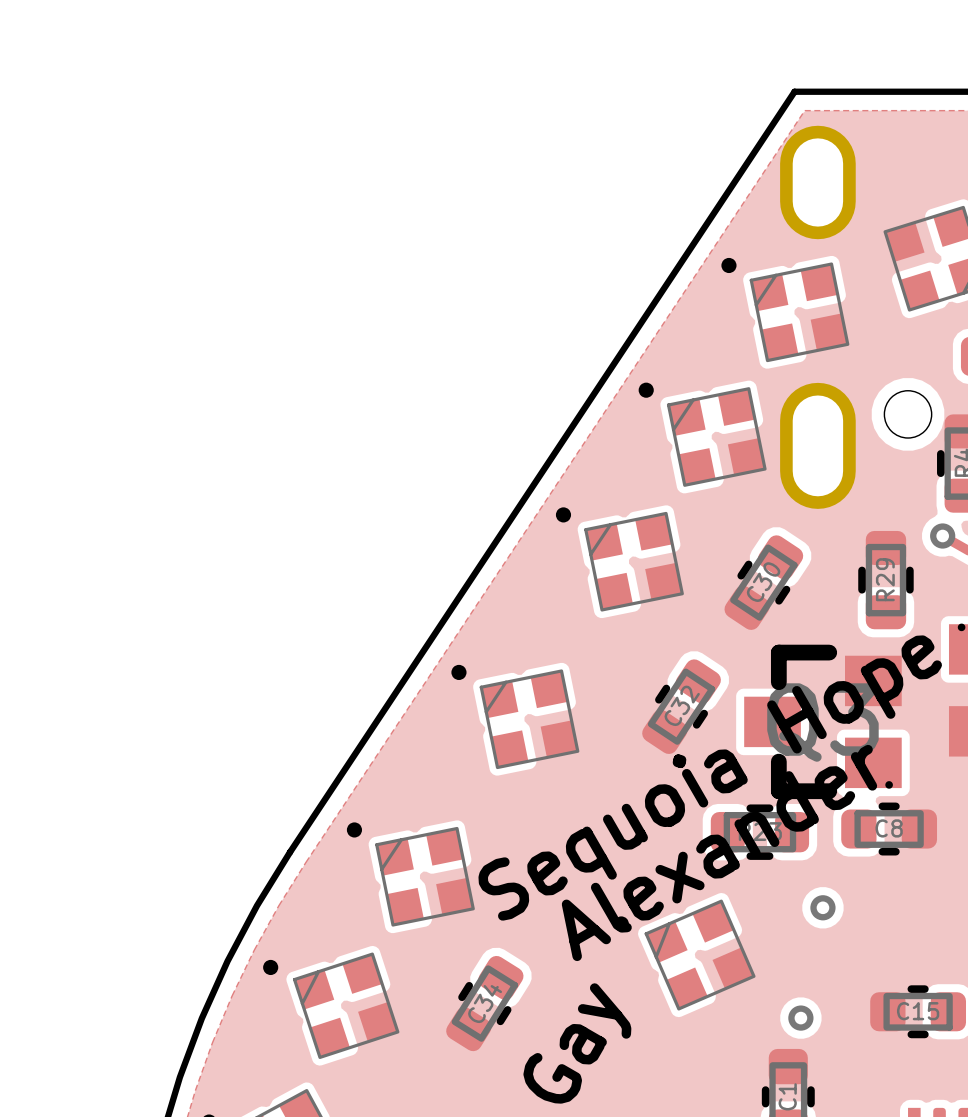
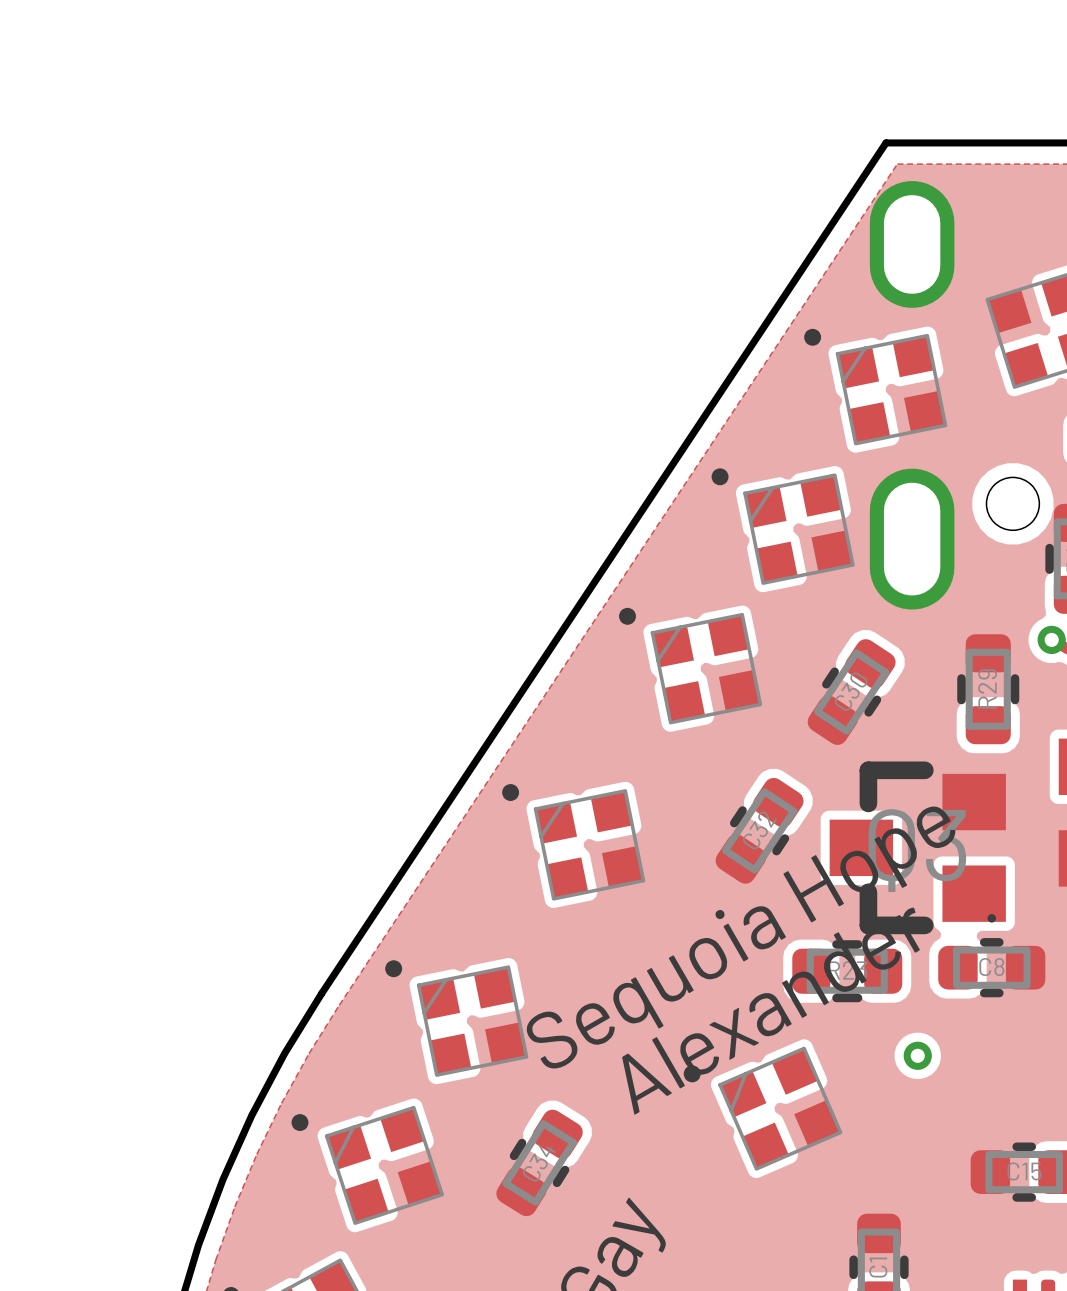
via: (800, 1018) -> none

